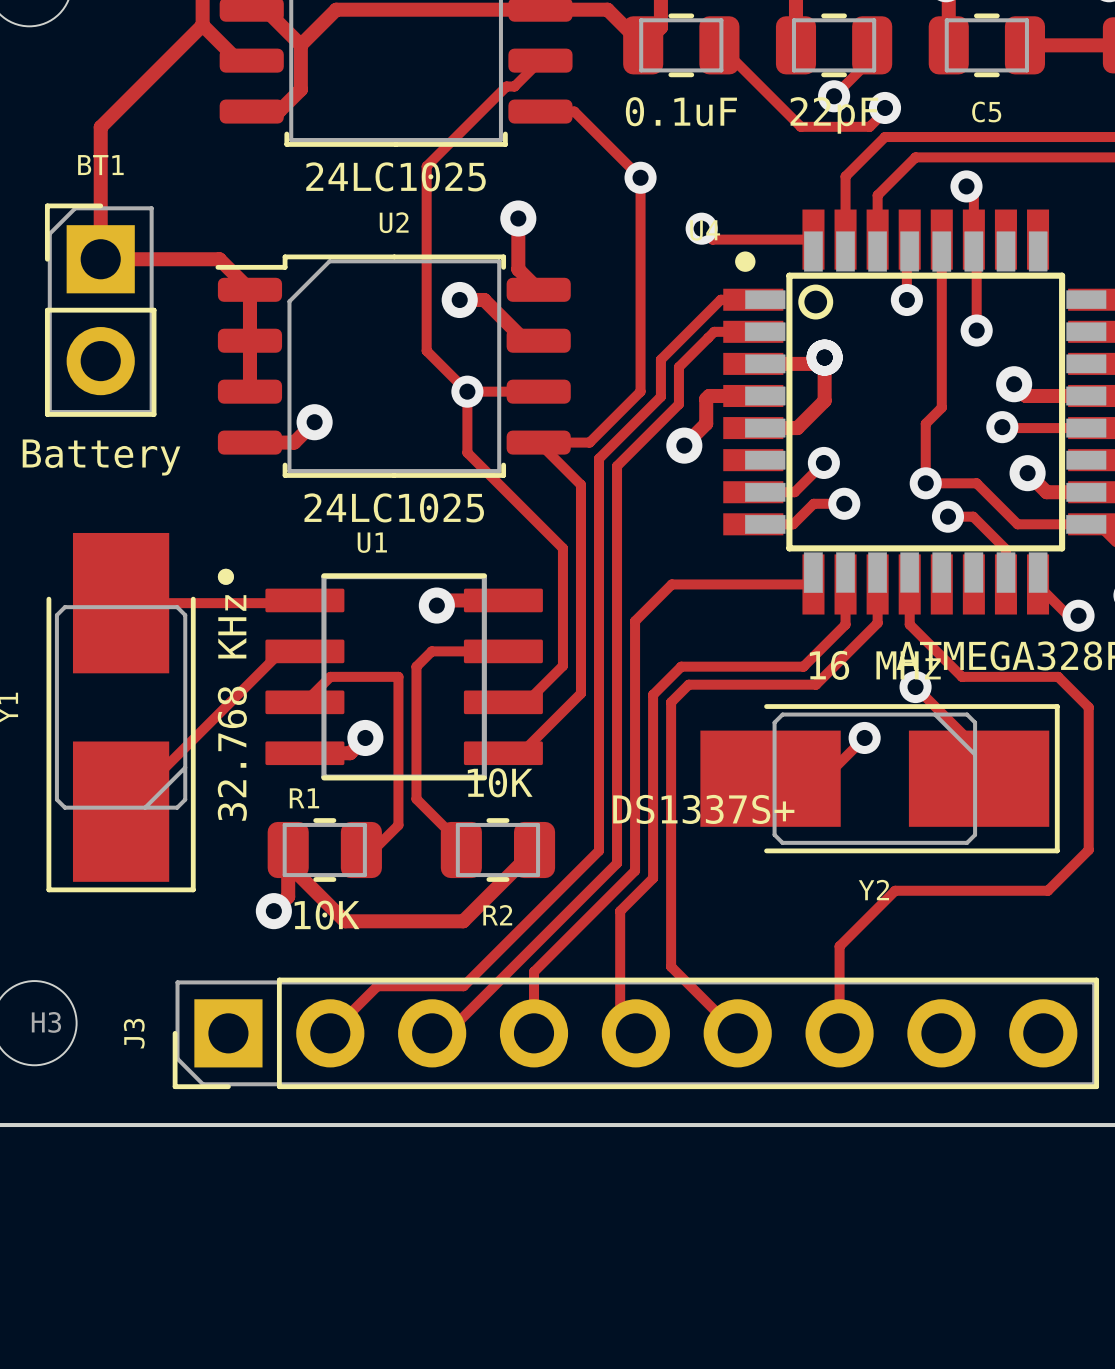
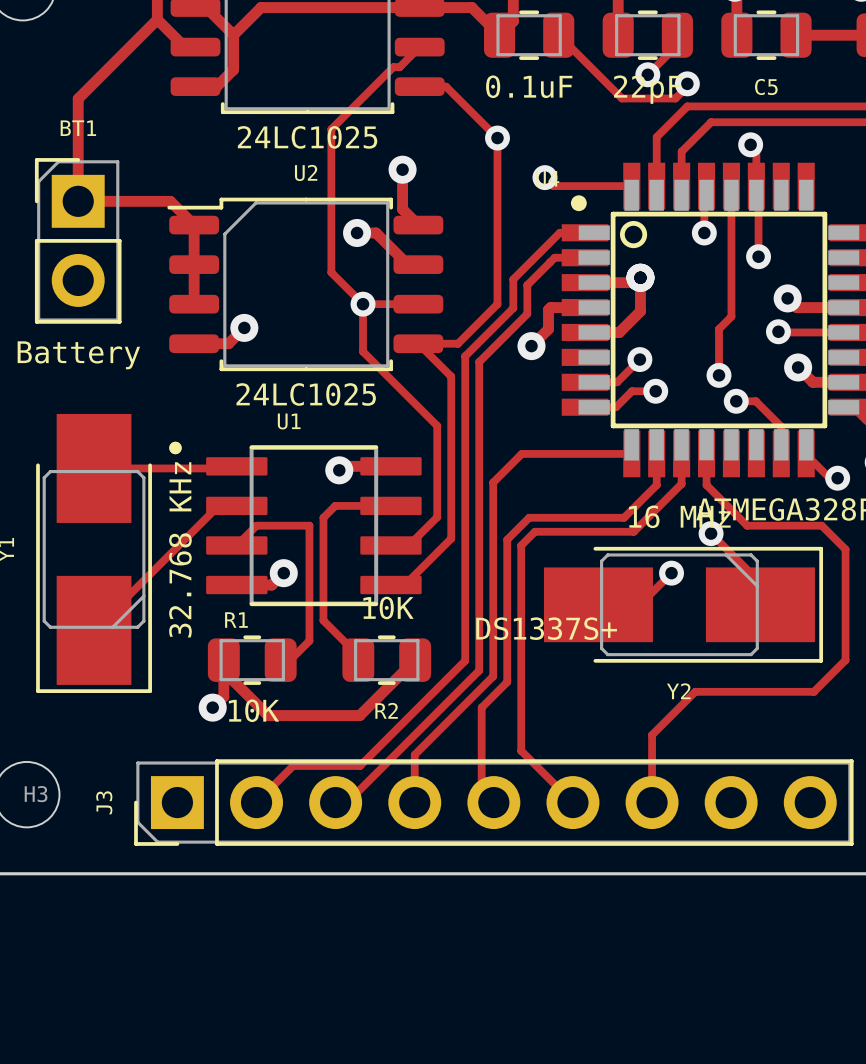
top track: (925, 483) (976, 483) (1017, 524) (1098, 524) -> none

